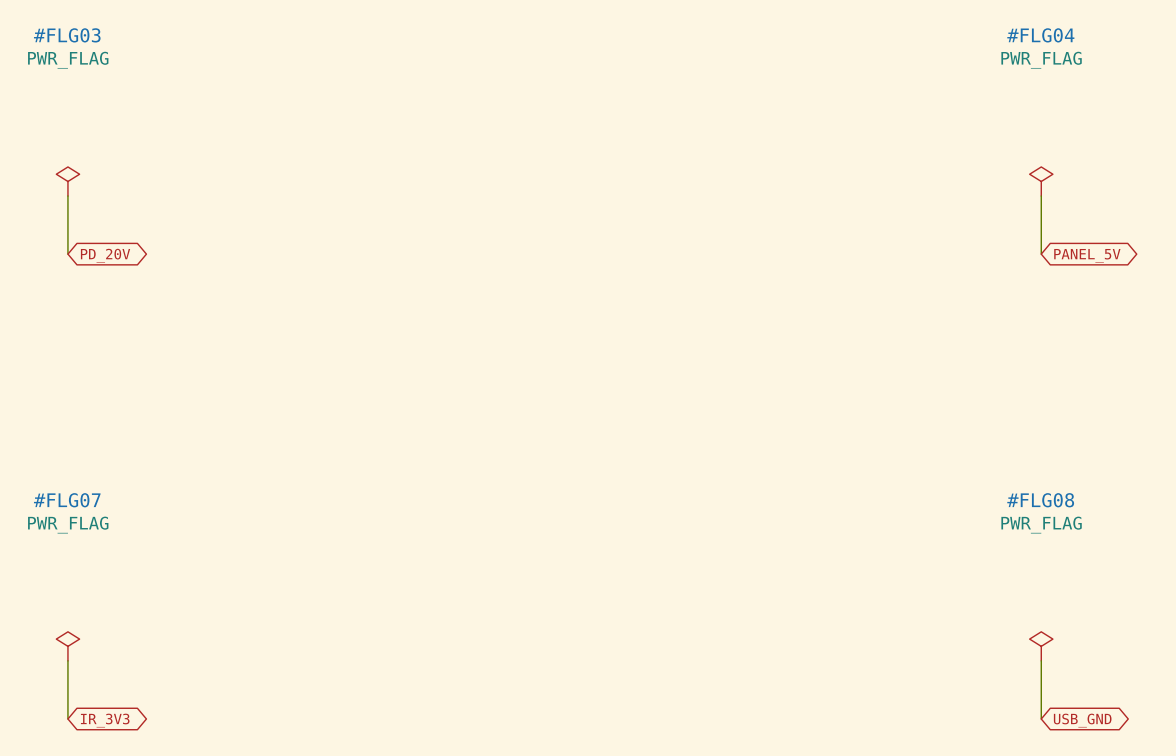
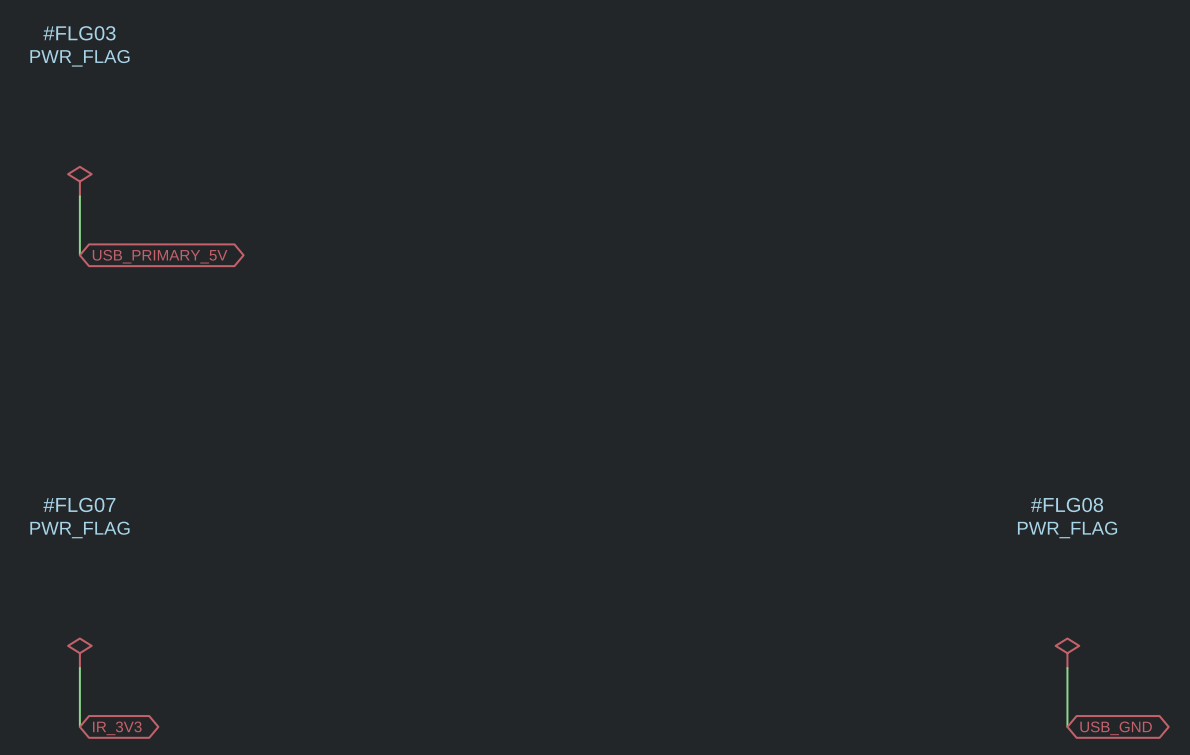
#FLG04: PWR_FLAG (1041, 181) -> none
wire: (1041, 196) (1041, 254) -> none
global label: PD_20V (105, 255) -> USB_PRIMARY_5V (160, 256)
global label: PANEL_5V (1087, 255) -> none

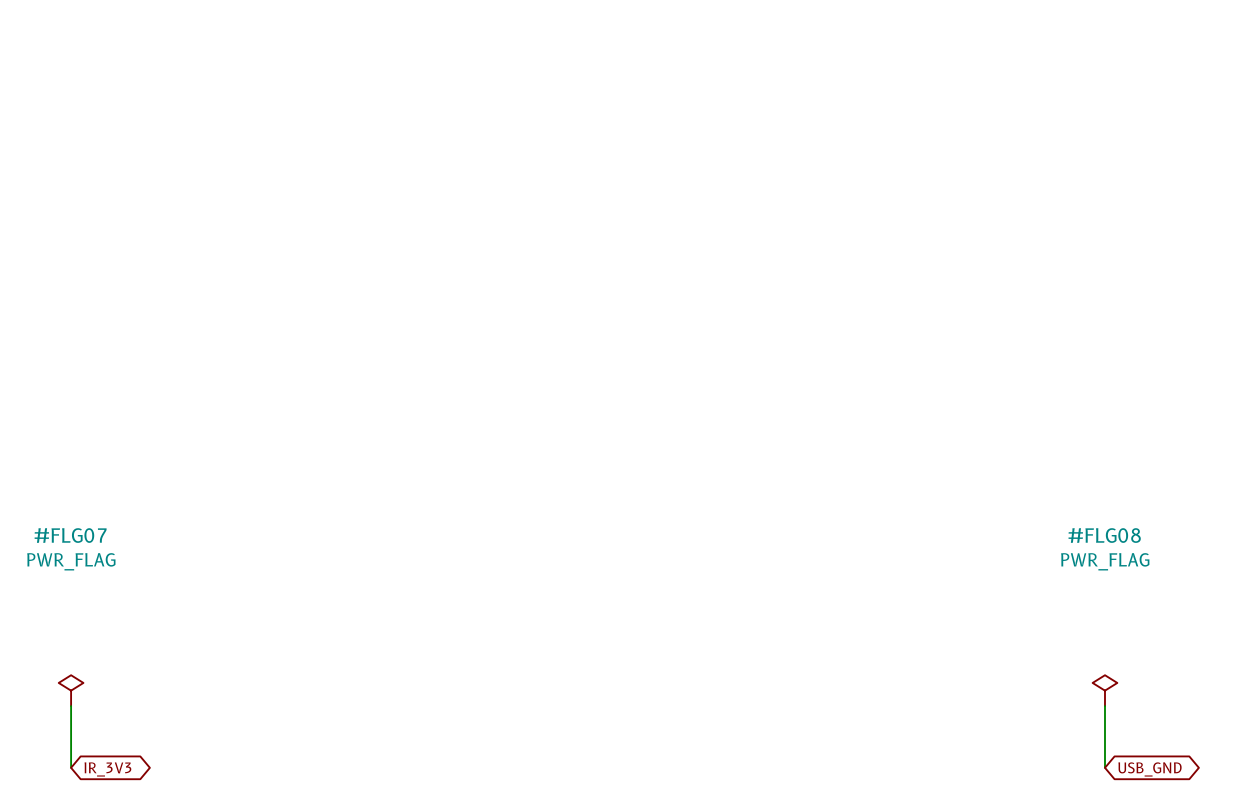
#FLG03: PWR_FLAG (79, 181) -> none
wire: (79, 196) (79, 255) -> none
global label: USB_PRIMARY_5V (160, 256) -> none

